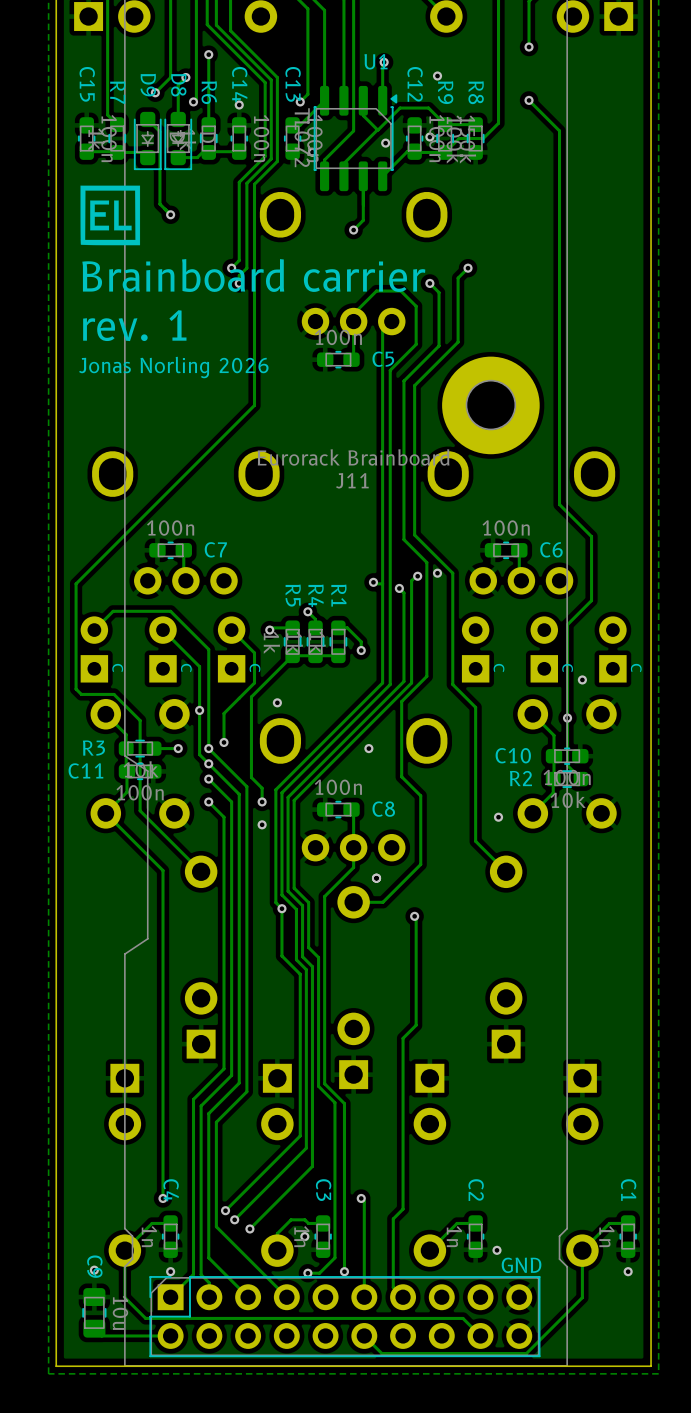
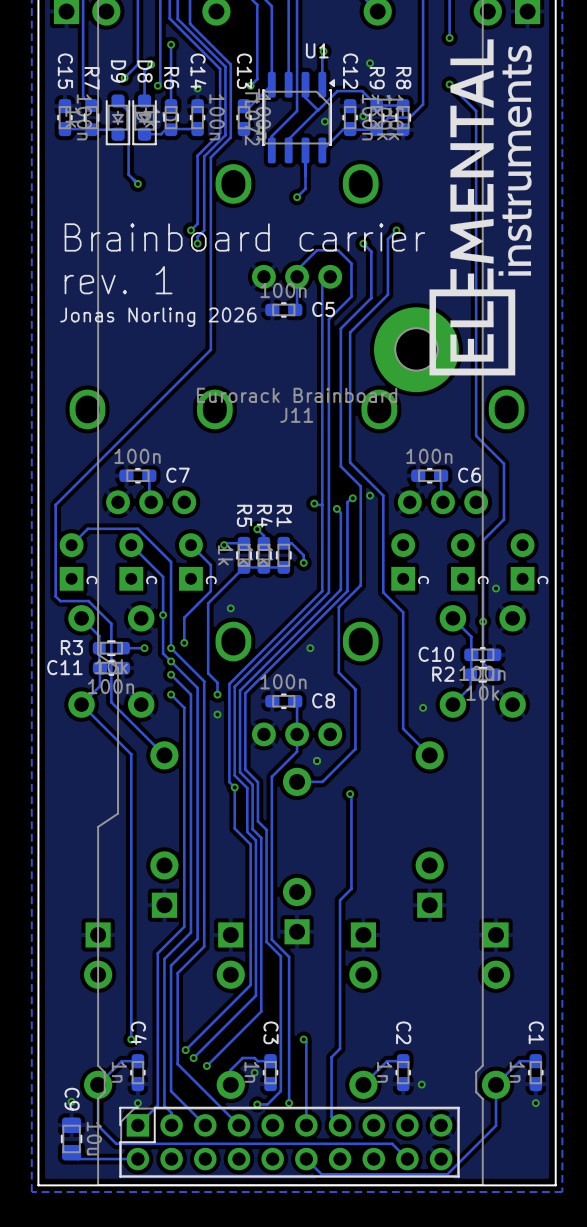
drawing: none -> [429, 39, 532, 376]
drawing: [80, 185, 141, 246] -> none
text: GND (521, 1265) -> none

